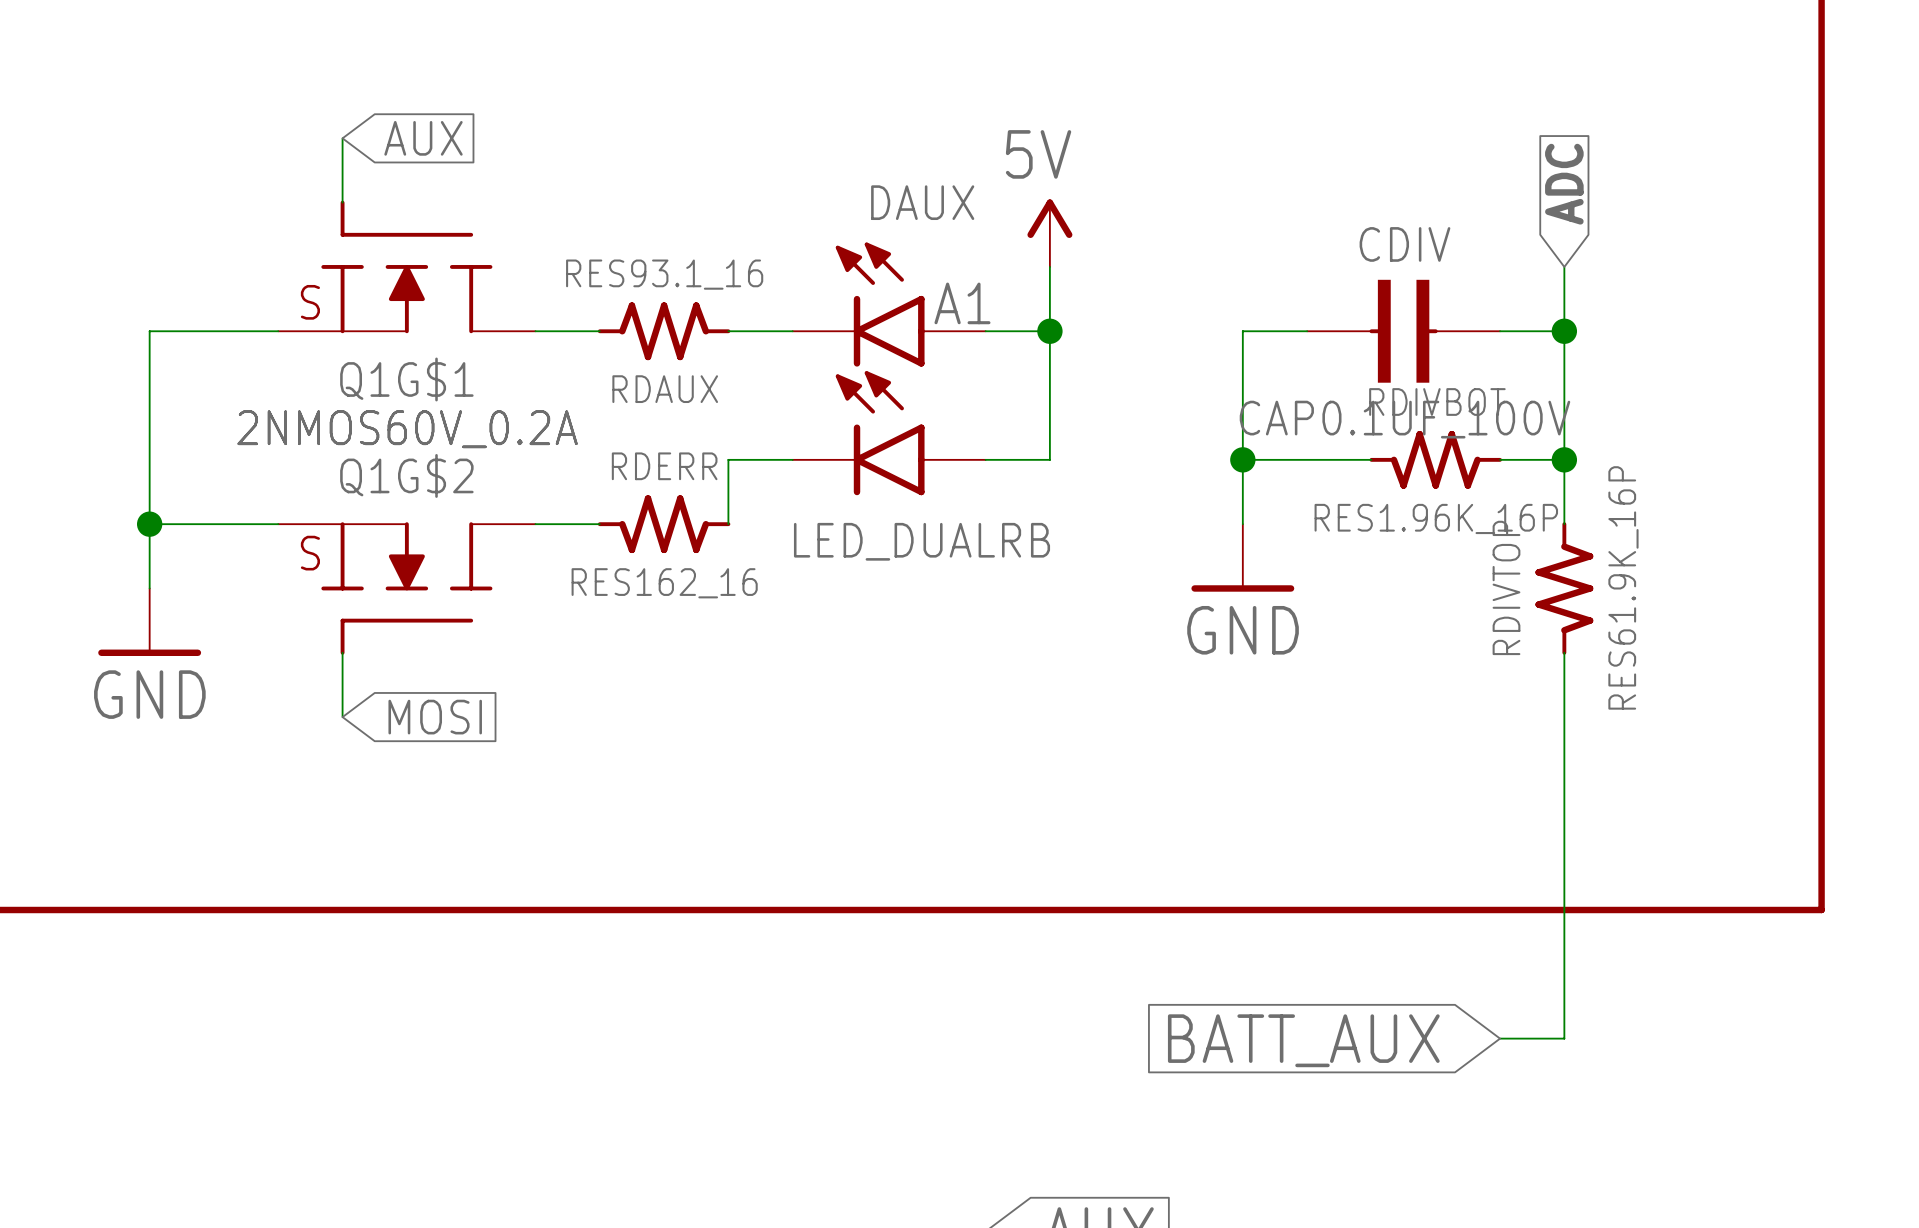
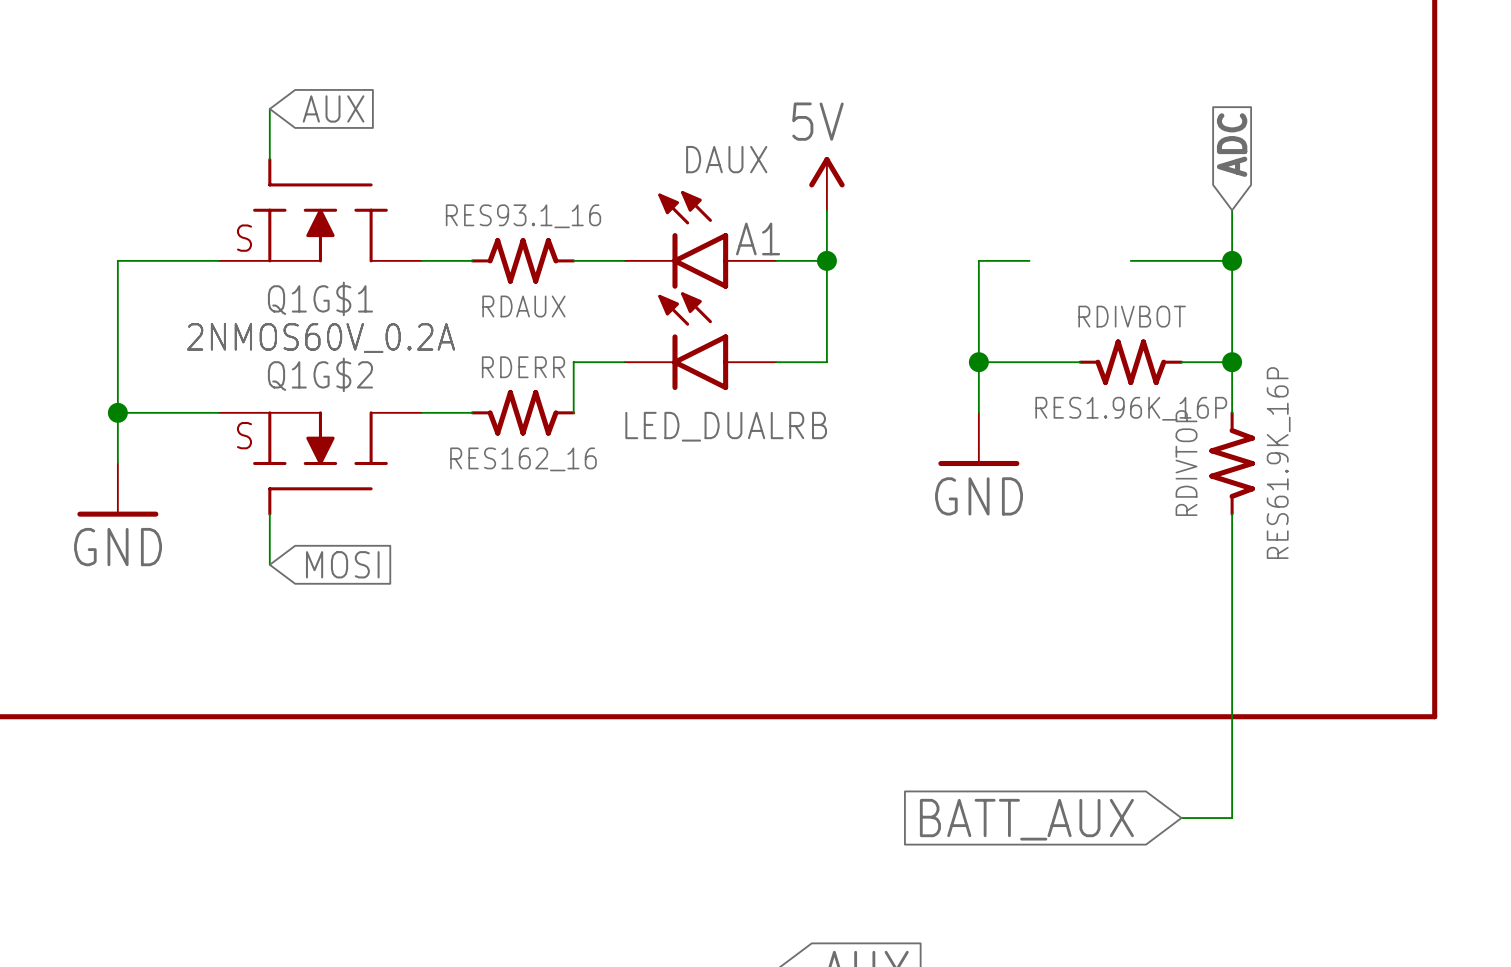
CDIV: CAP0.1UF_100V (1403, 331) -> none

